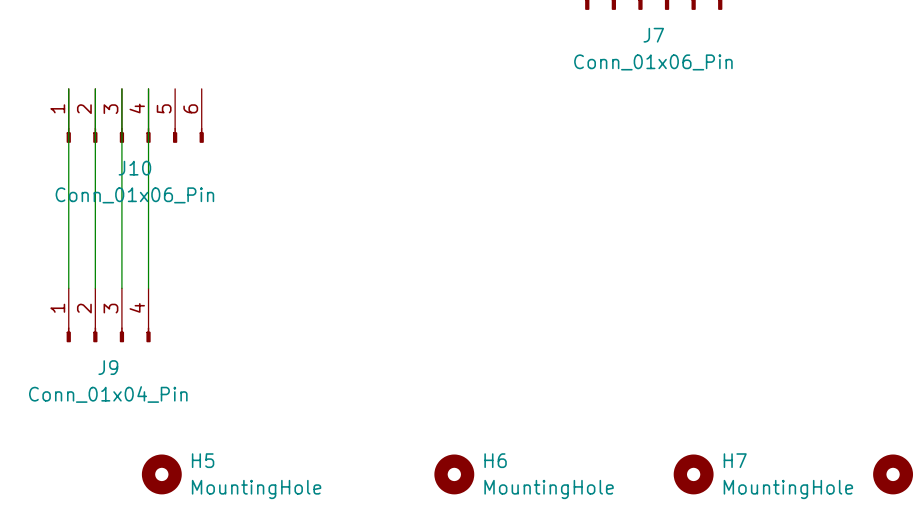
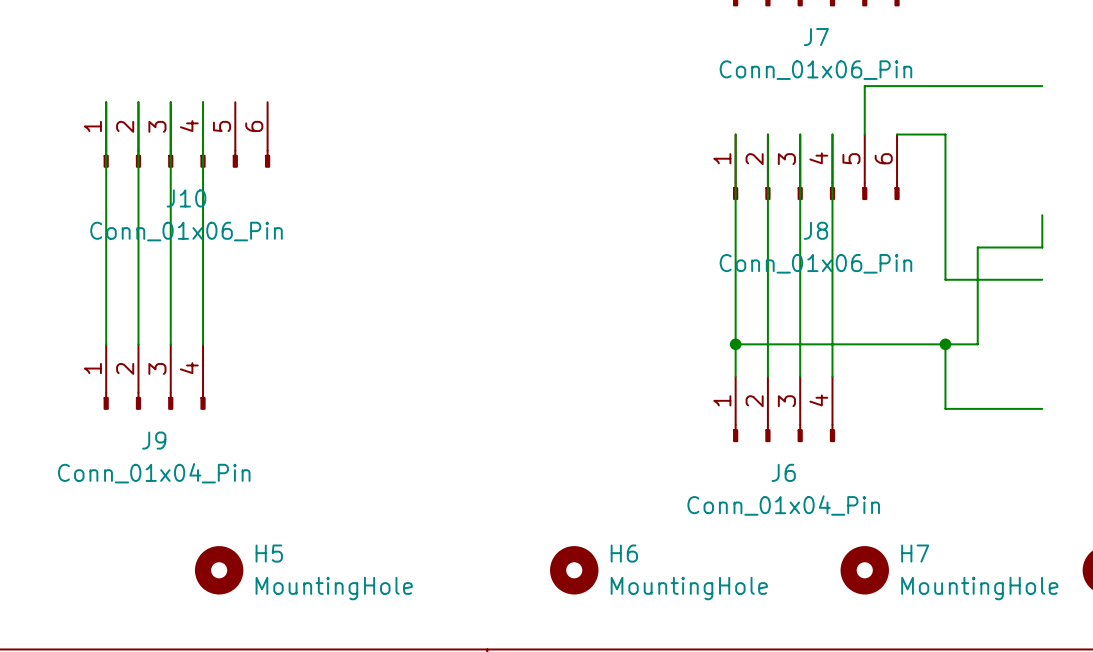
wire: none -> (1042, 86) (864, 86) (864, 134)
wire: none -> (735, 134) (735, 376)
wire: none -> (767, 134) (767, 376)
wire: none -> (800, 134) (800, 376)
wire: none -> (832, 134) (832, 376)
wire: none -> (897, 134) (945, 134) (945, 279) (1042, 279)
J8: none -> Conn_01x06_Pin (816, 167)
wire: none -> (1042, 215) (1042, 247) (977, 247) (977, 344) (735, 344)
junction: none -> (735, 344)
wire: none -> (945, 344) (945, 408) (1042, 408)
junction: none -> (945, 344)
J6: none -> Conn_01x04_Pin (784, 409)

